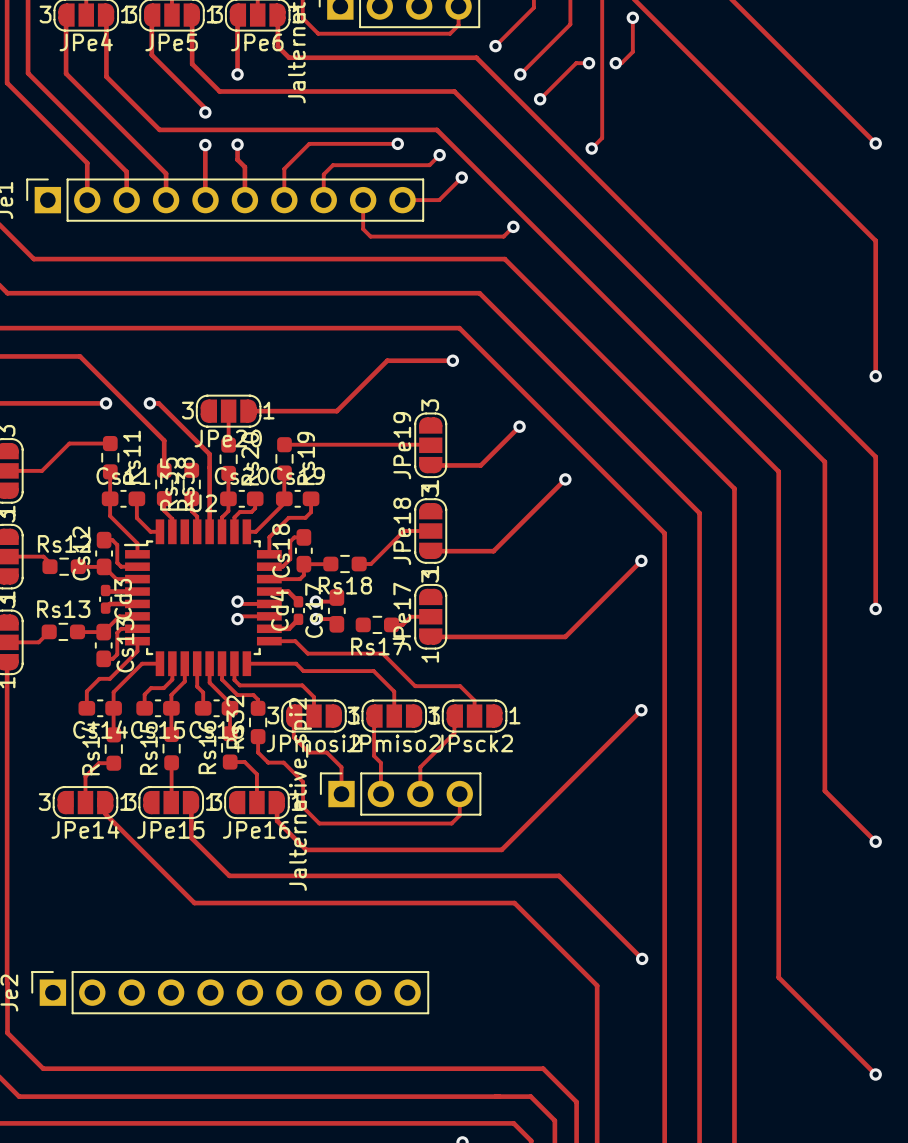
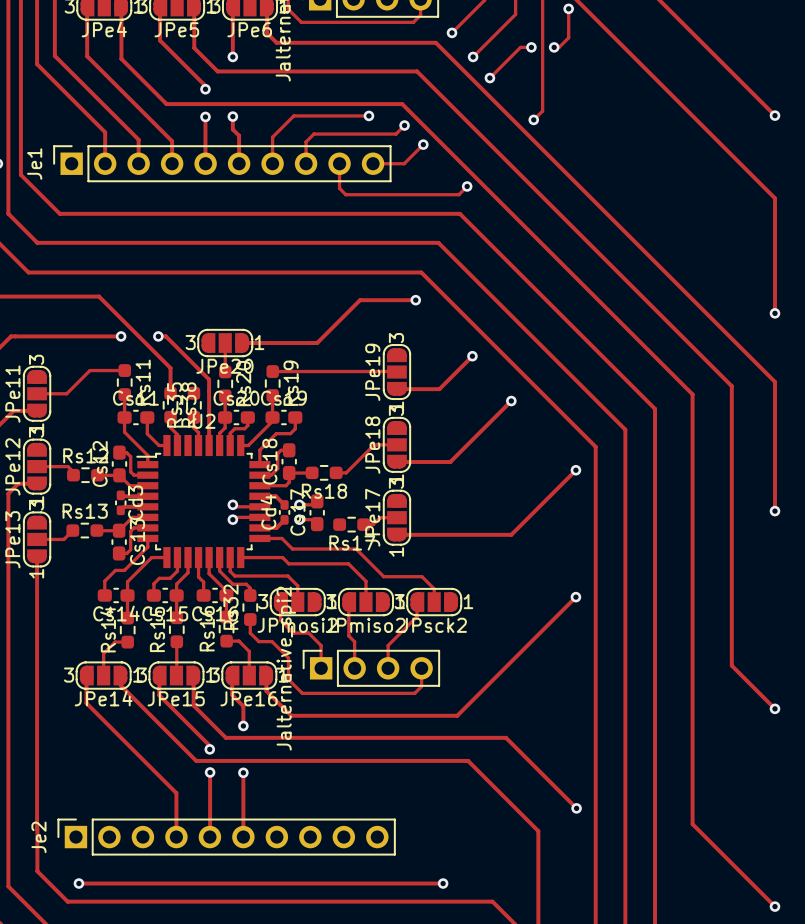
track: none -> (86, 675) (86, 703) (176, 793) (176, 837)
track: none -> (159, 675) (159, 695) (209, 745) (209, 749)
track: none -> (232, 675) (232, 695) (243, 706) (243, 725)
via: none -> (243, 725)
via: none -> (209, 749)
track: none -> (210, 772) (209, 837)
via: none -> (210, 772)
track: none -> (243, 772) (243, 837)
via: none -> (243, 772)
track: none -> (78, 883) (443, 883)
via: none -> (78, 883)
via: none -> (443, 883)

